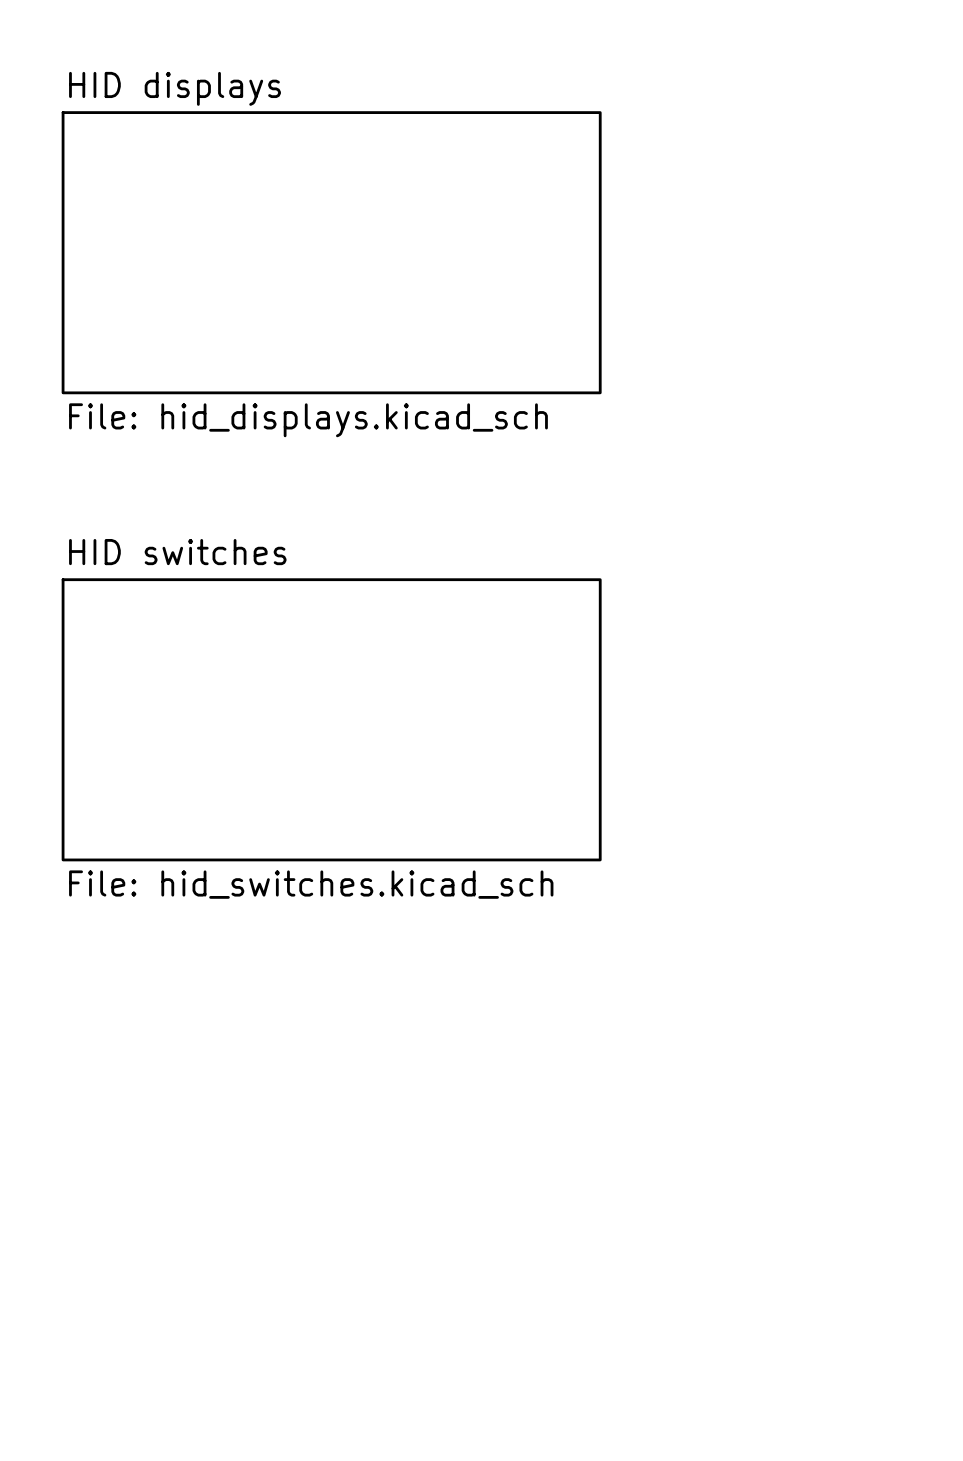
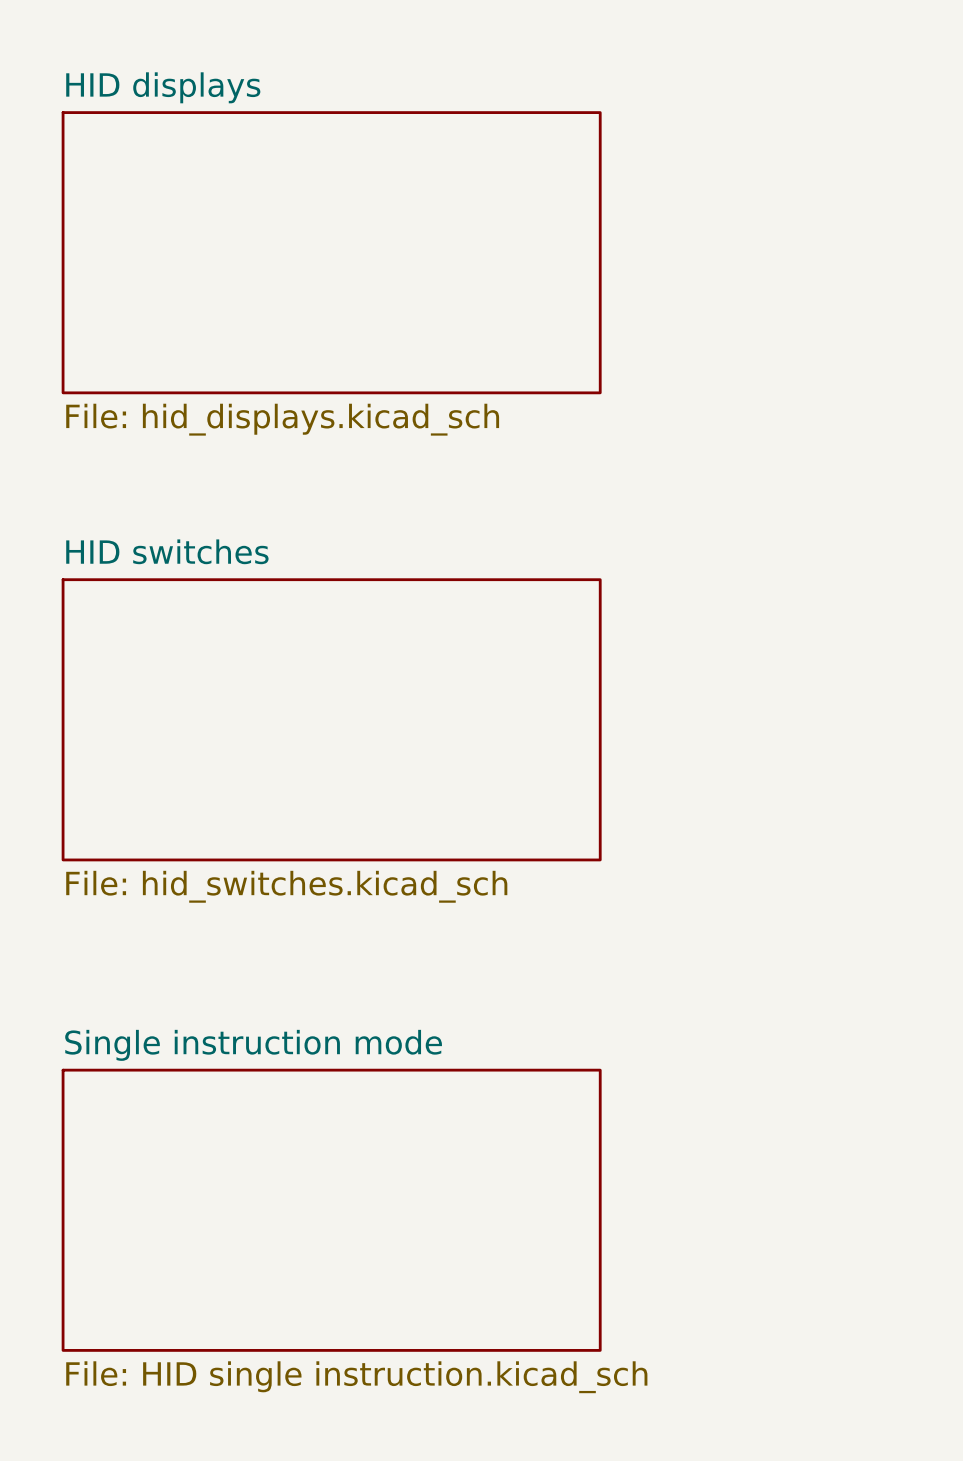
sheet Single instruction mode: none -> File: HID single instruction.kicad_sch (331, 1210)

